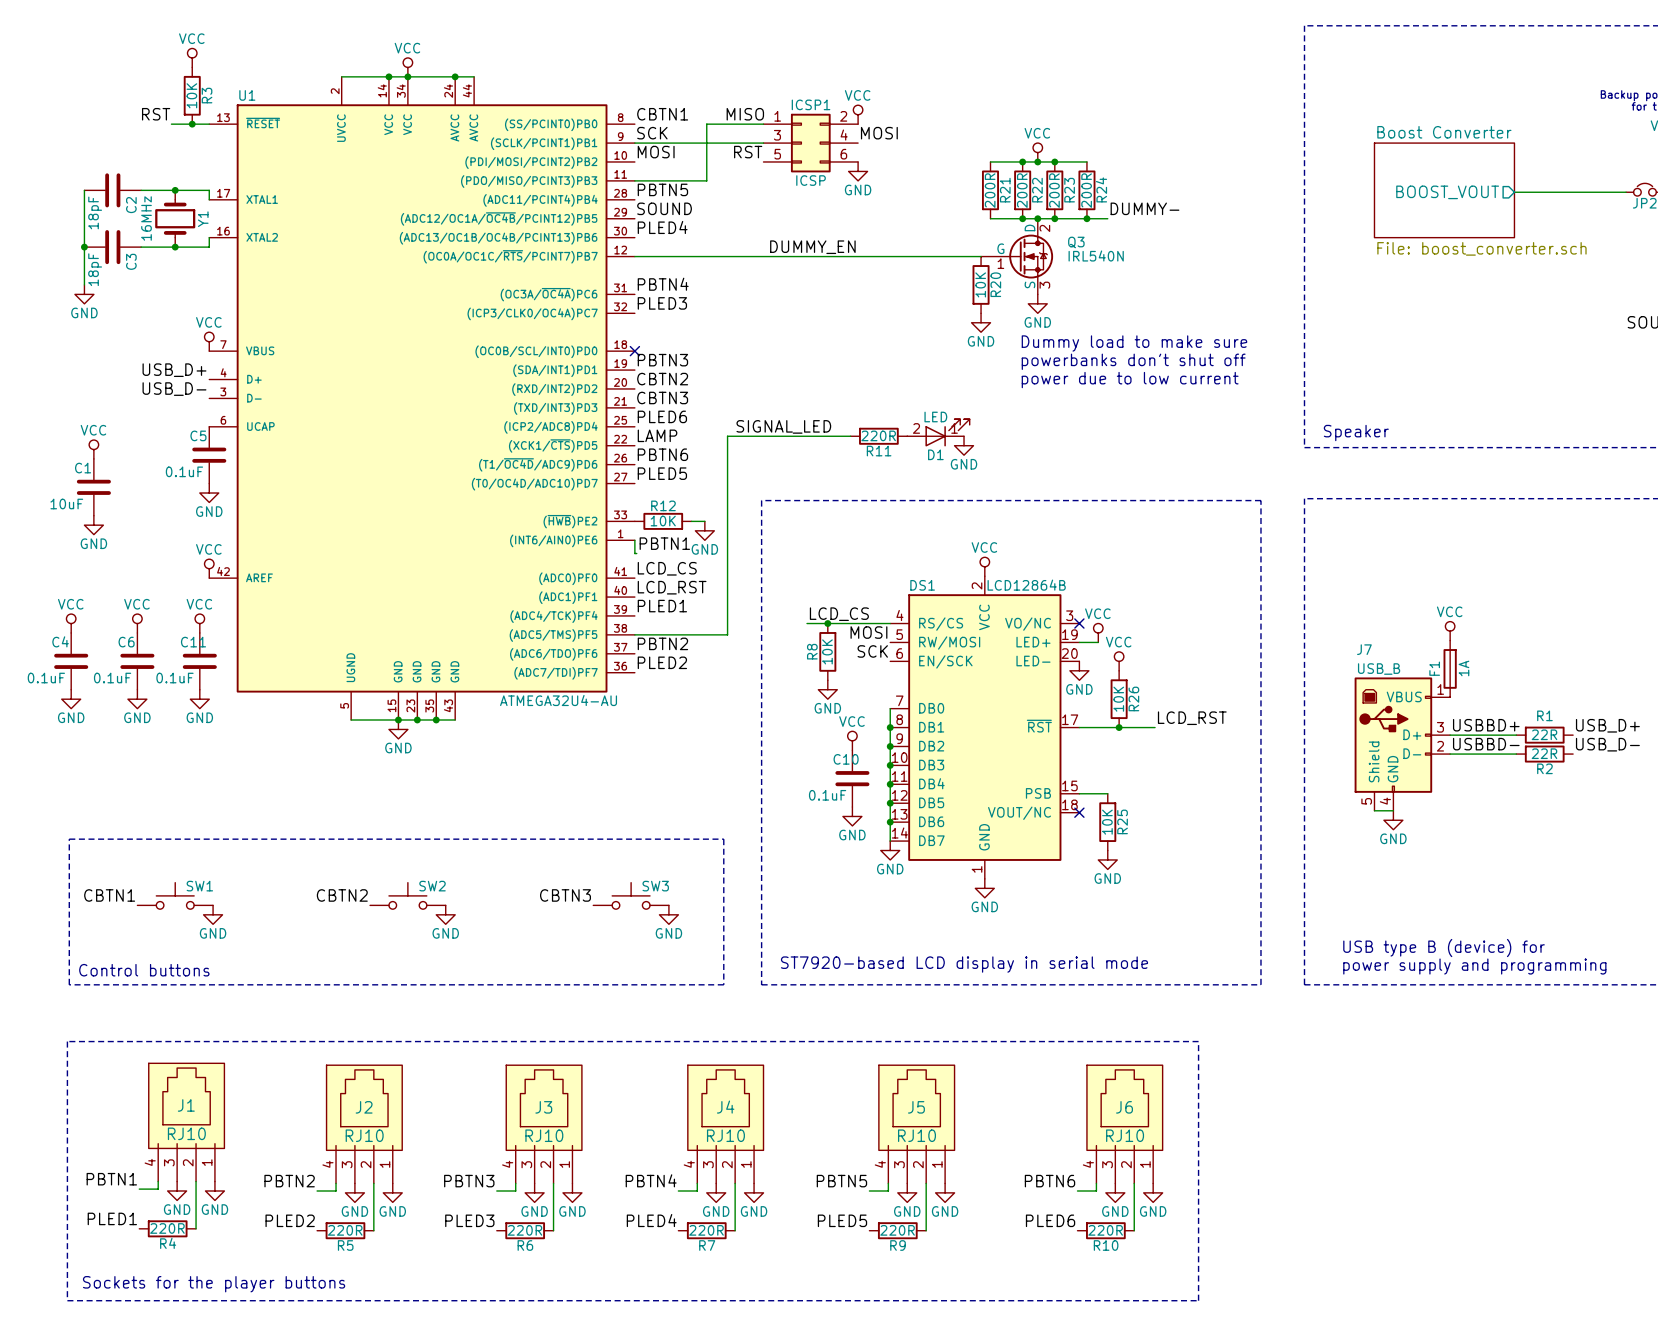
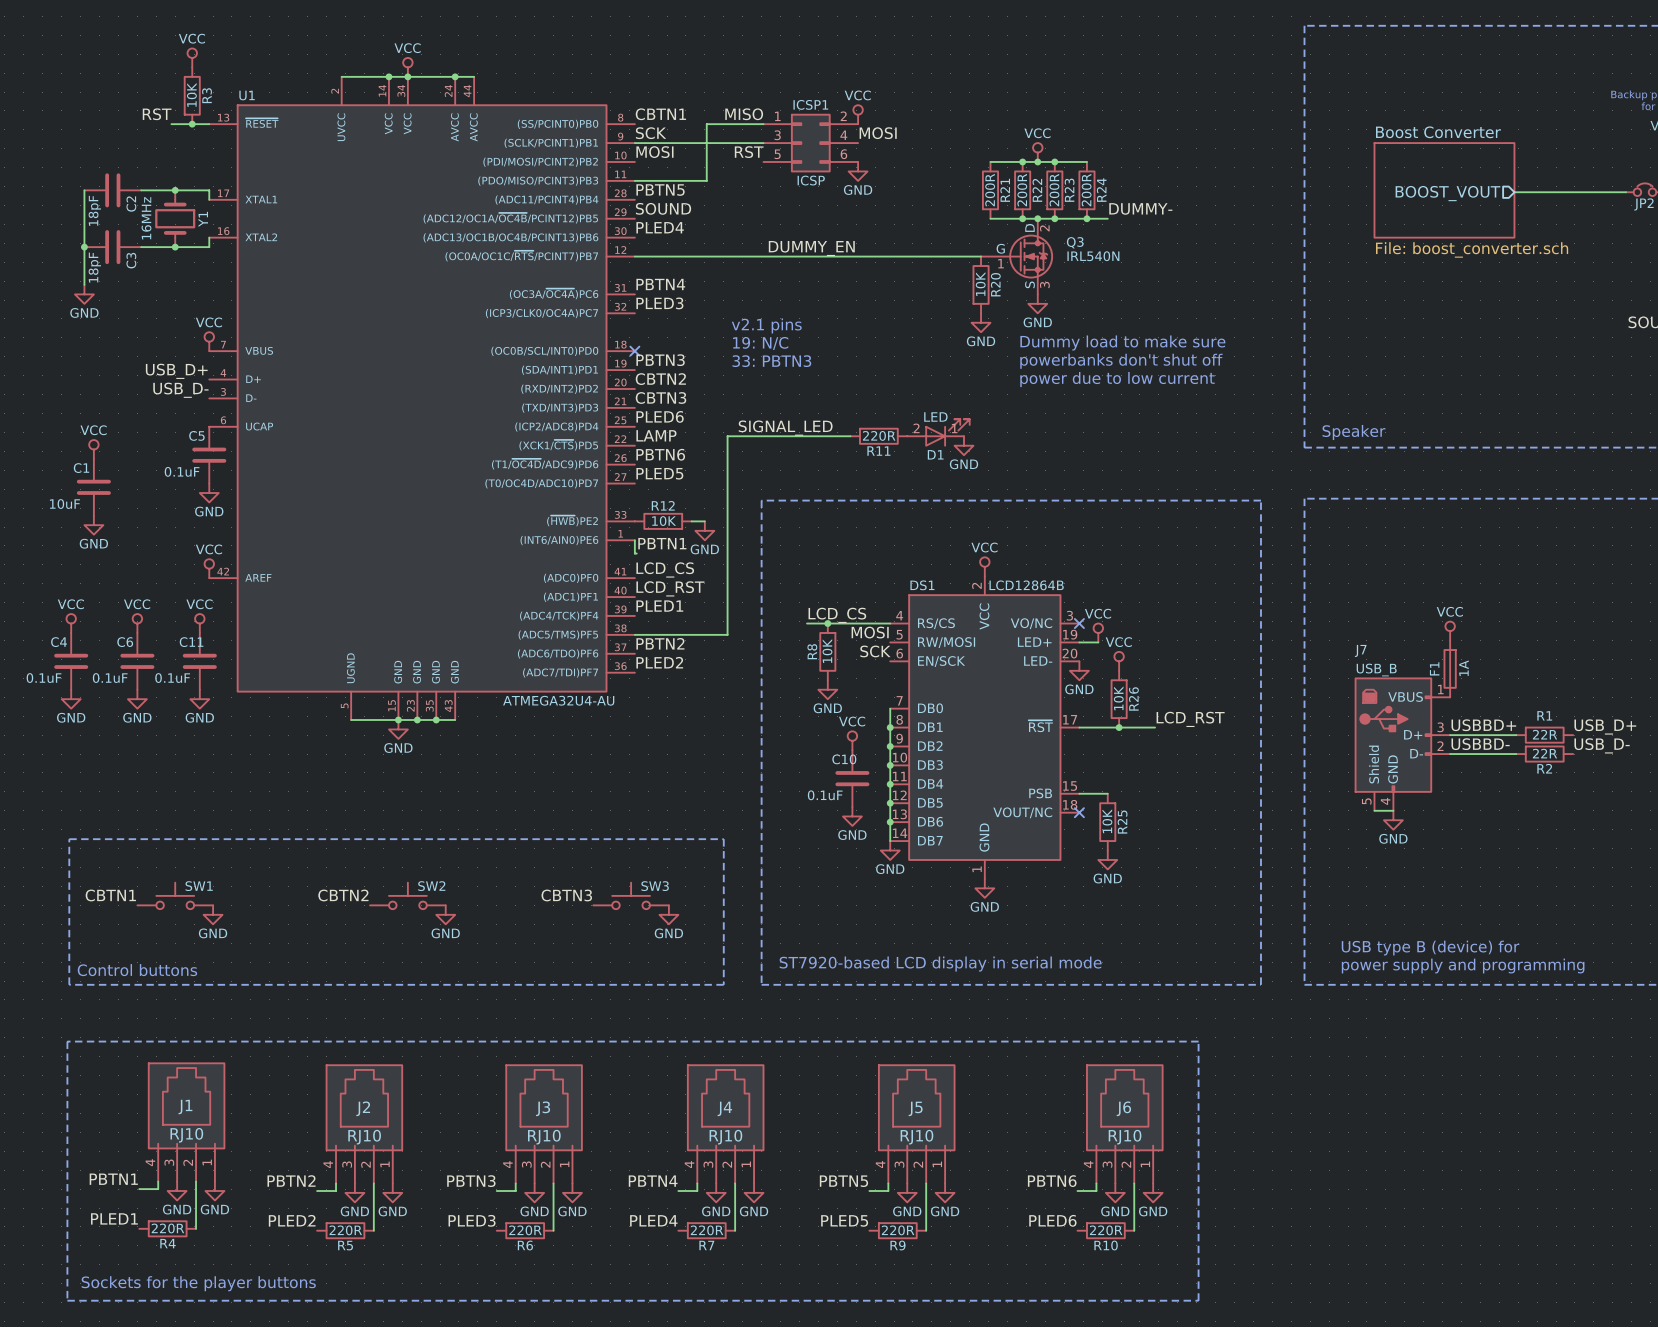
text: none -> v2.1 pins (766, 325)
text: none -> 19: N/C (760, 343)
text: none -> 33: PBTN3 (771, 361)

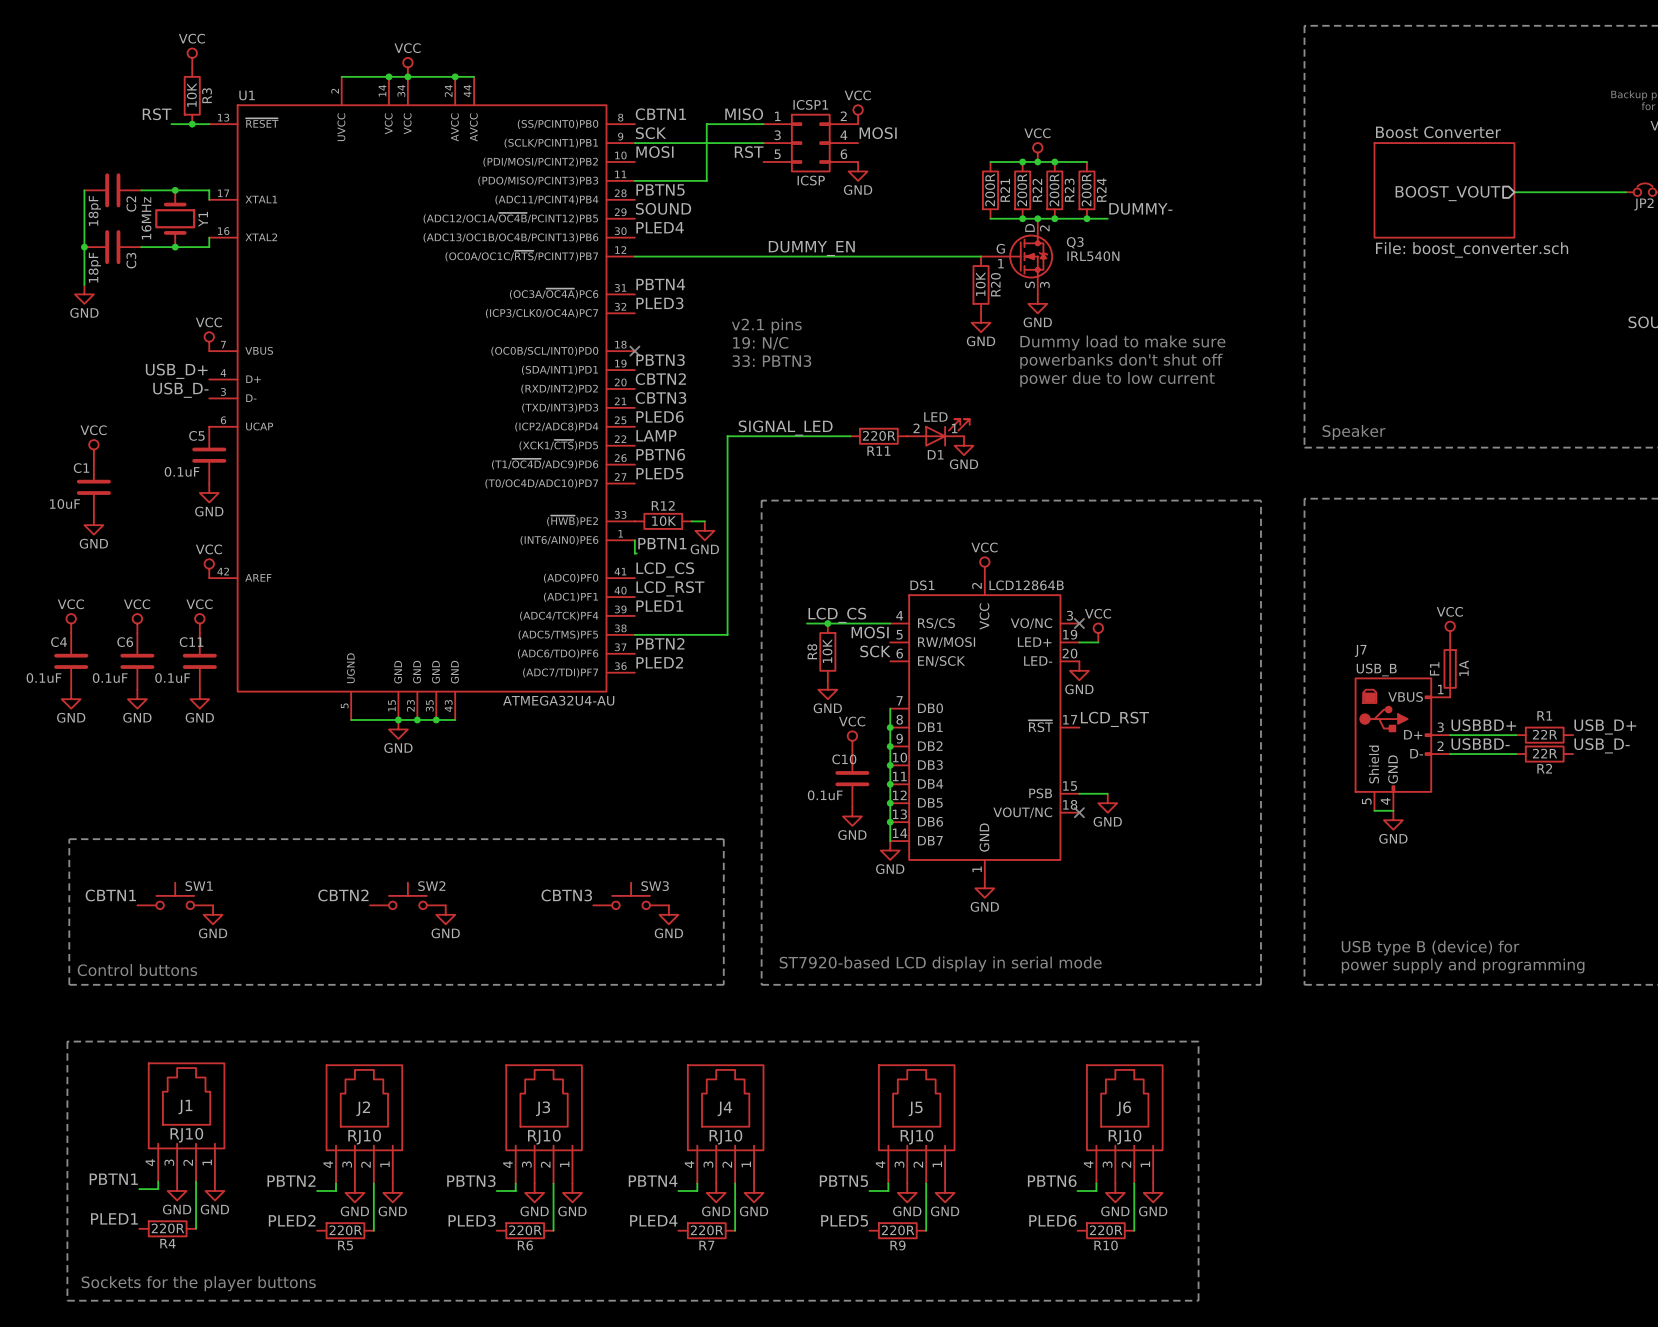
power symbol: VCC (1119, 661) -> none
R26: 10K (1119, 699) -> none
label position: LCD_RST (1190, 719) -> LCD_RST (1114, 719)
wire: (1079, 727) (1155, 727) -> none
junction: (1119, 727) -> none
R25: 10K (1107, 822) -> none
power symbol position: GND (1107, 859) -> GND (1107, 803)

